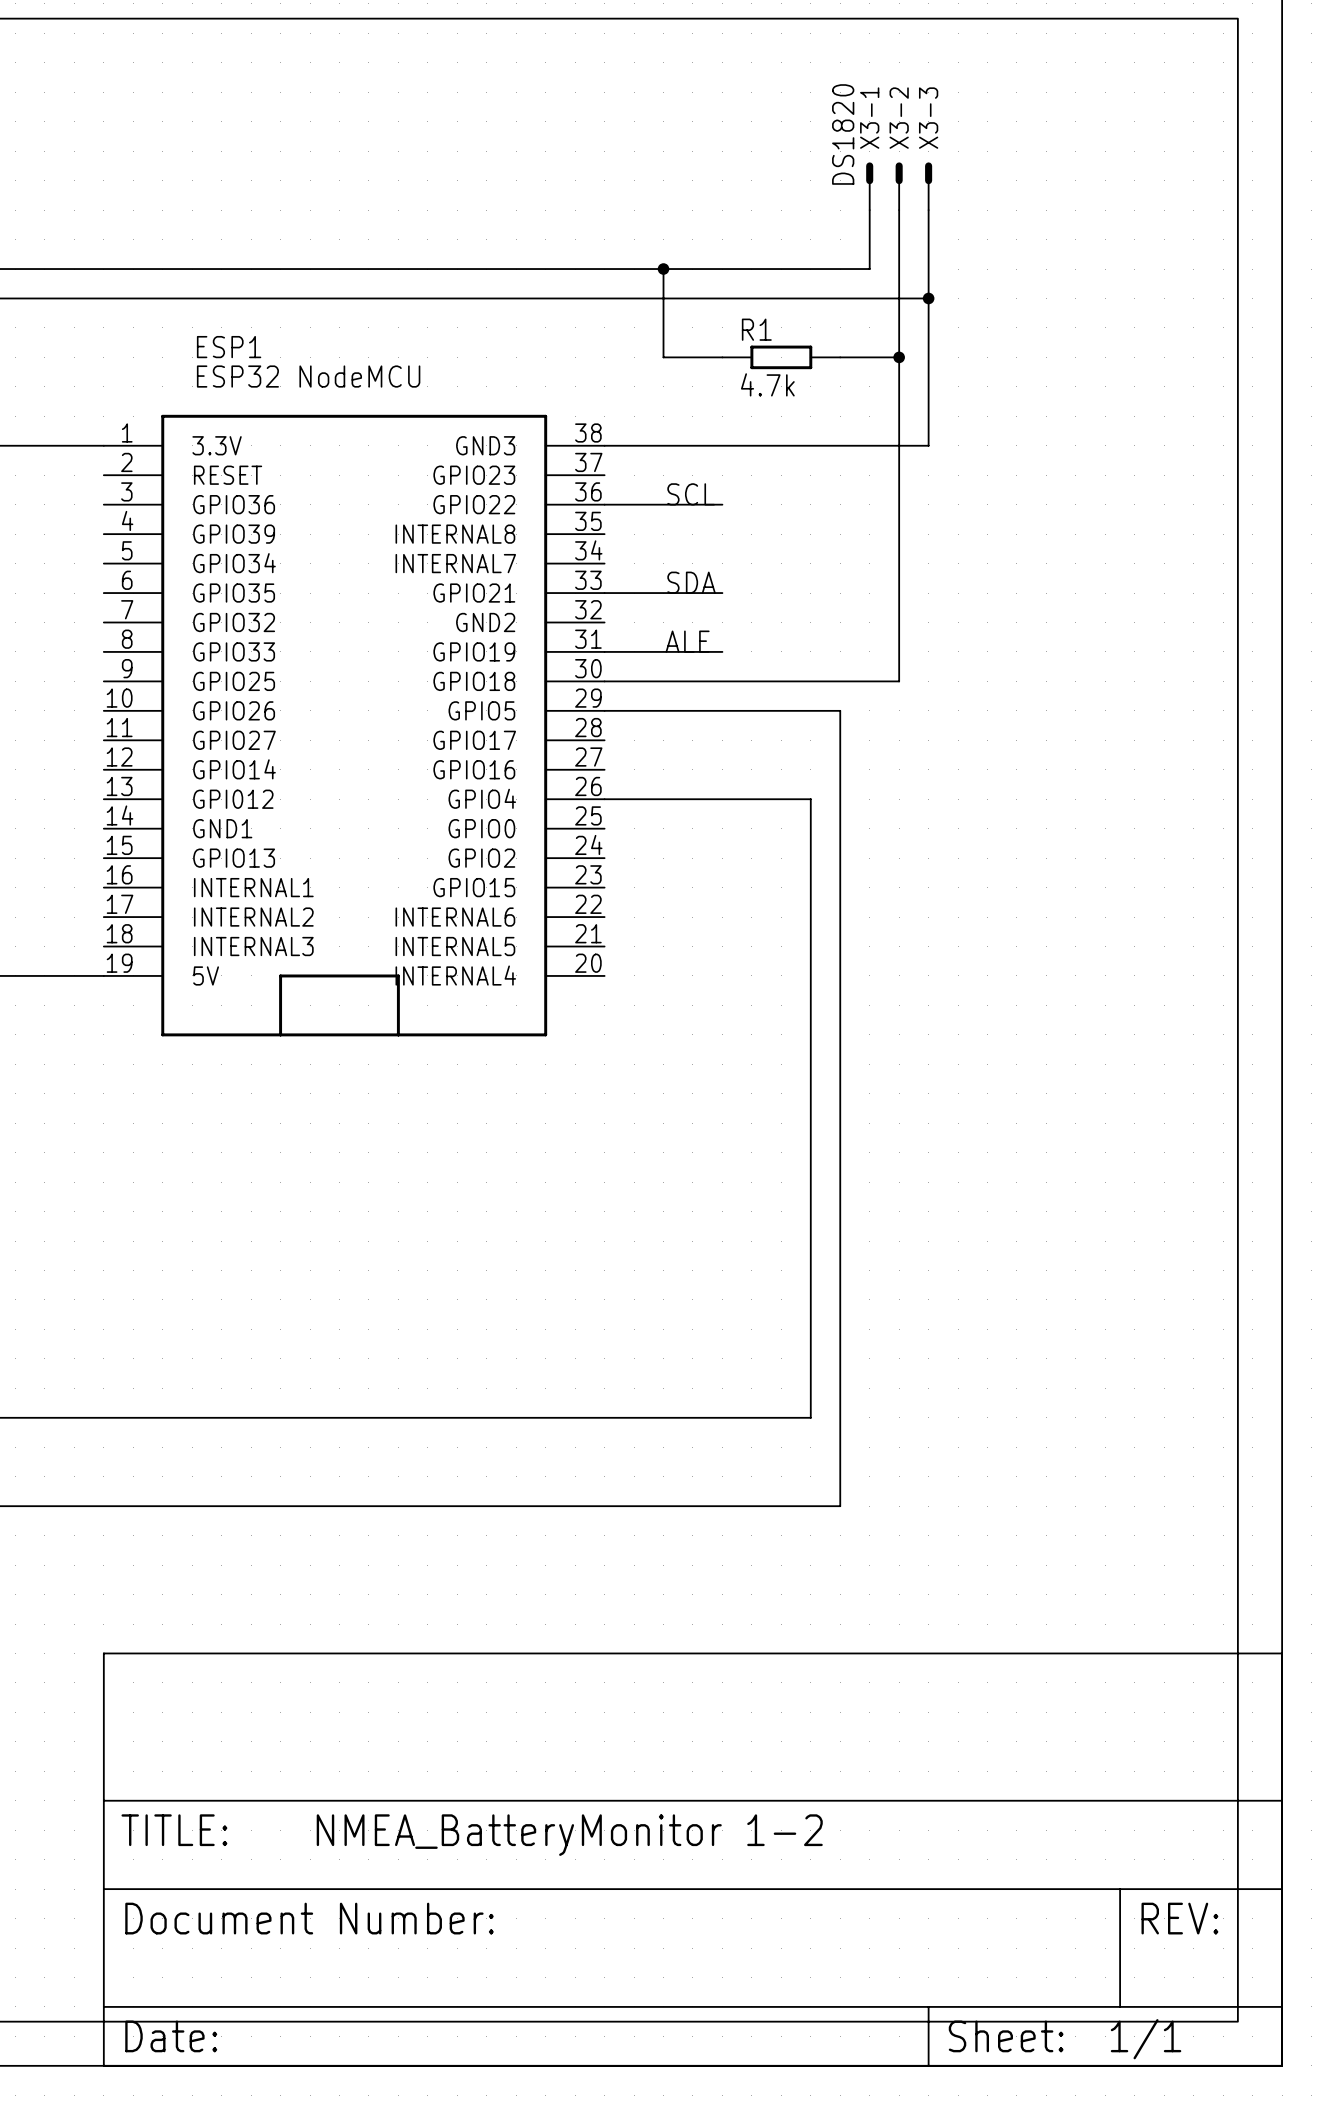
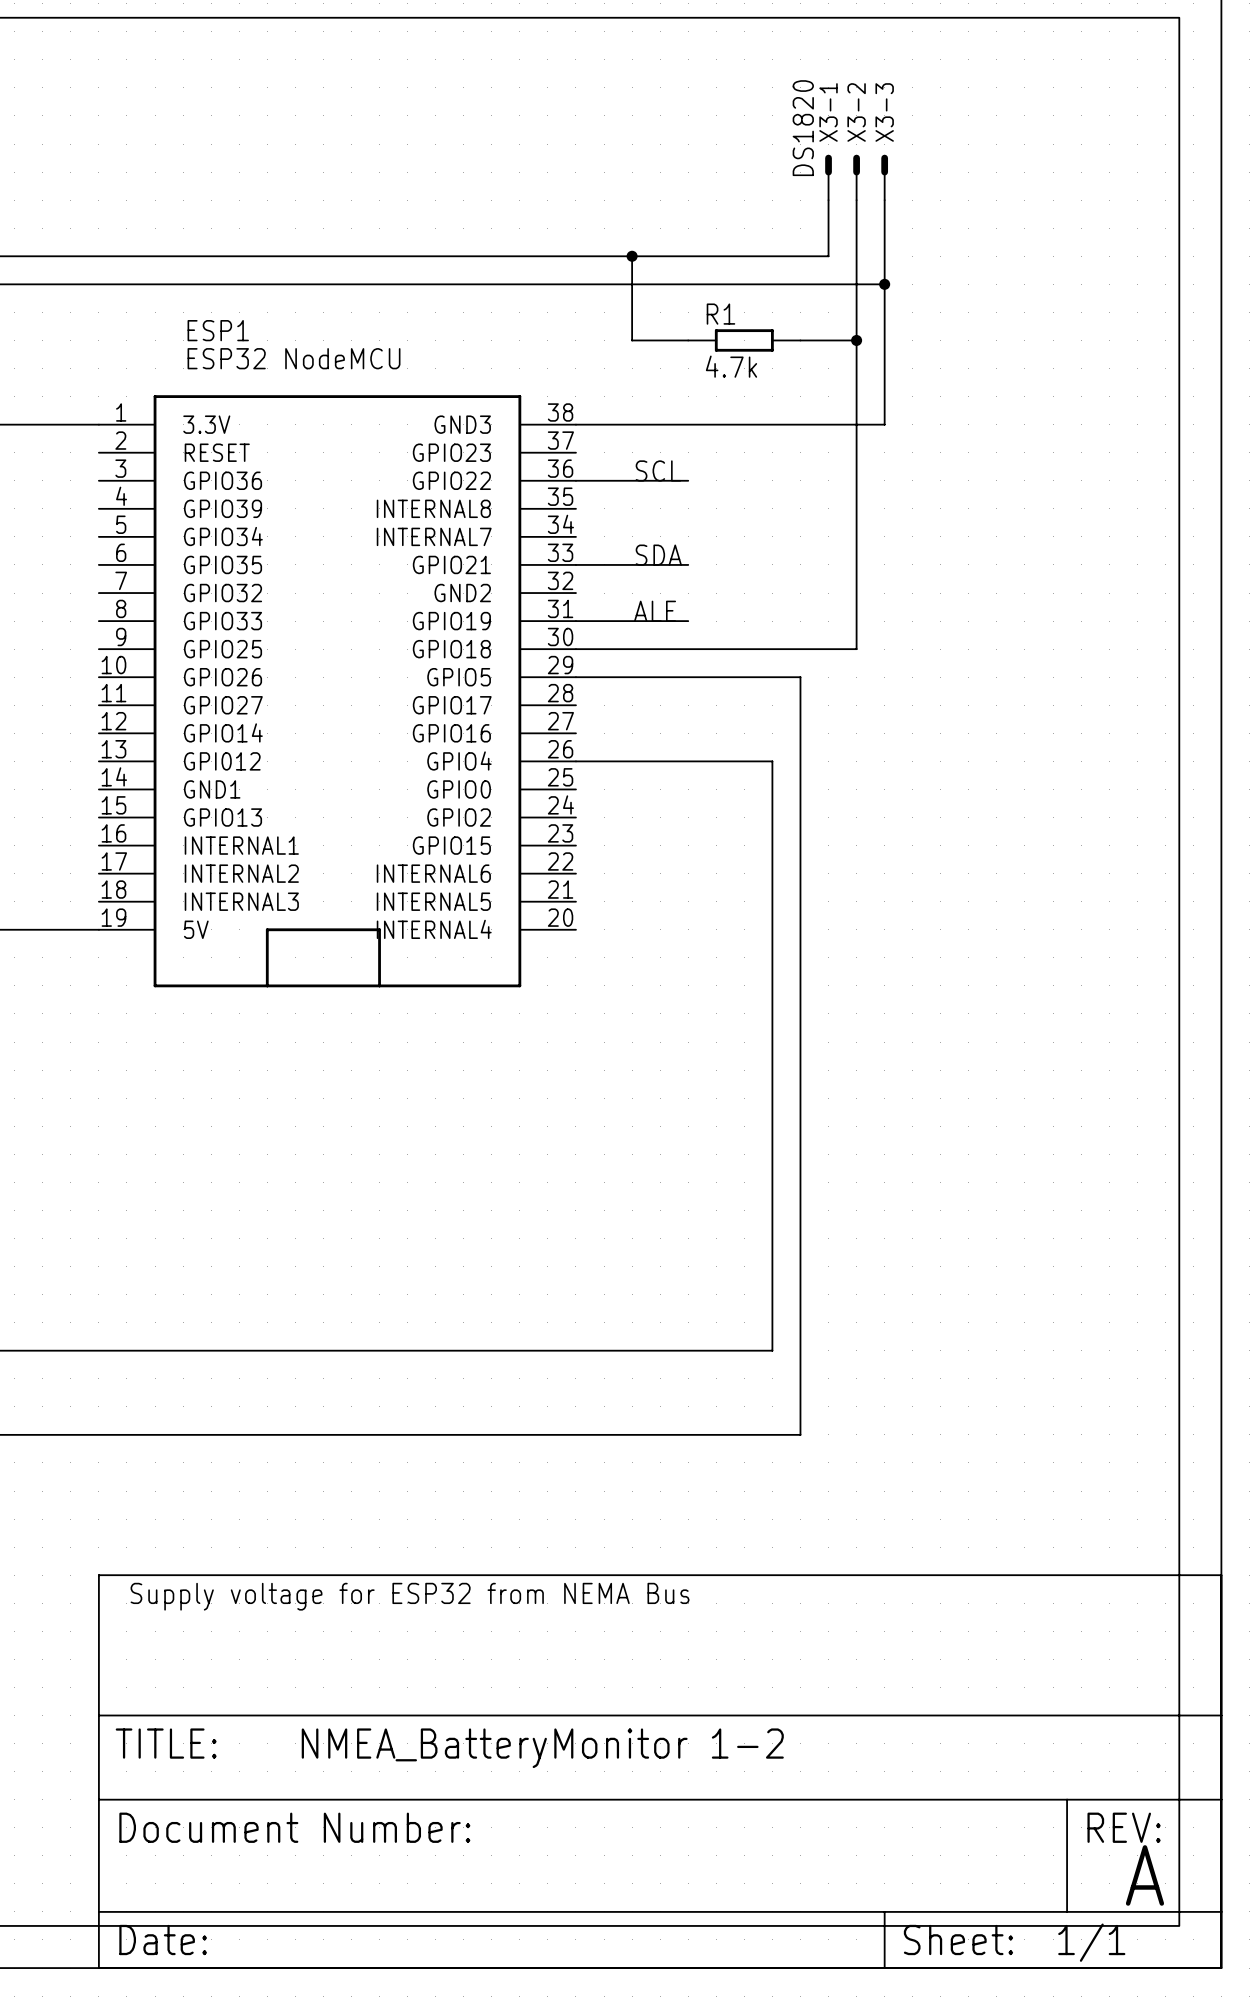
text: none -> Supply voltage for ESP32 from NEMA Bus (410, 1596)
text: none -> A (1144, 1875)

